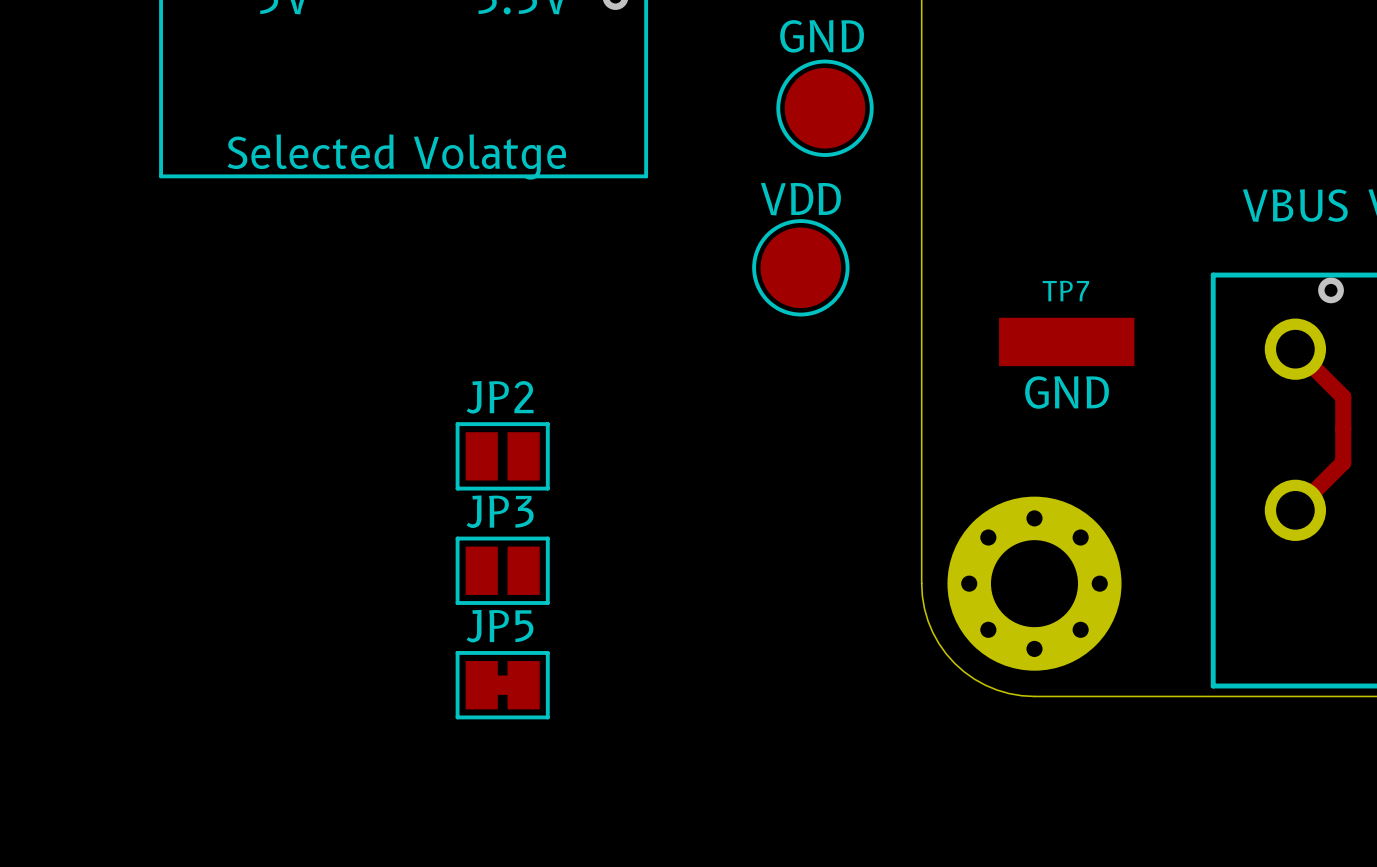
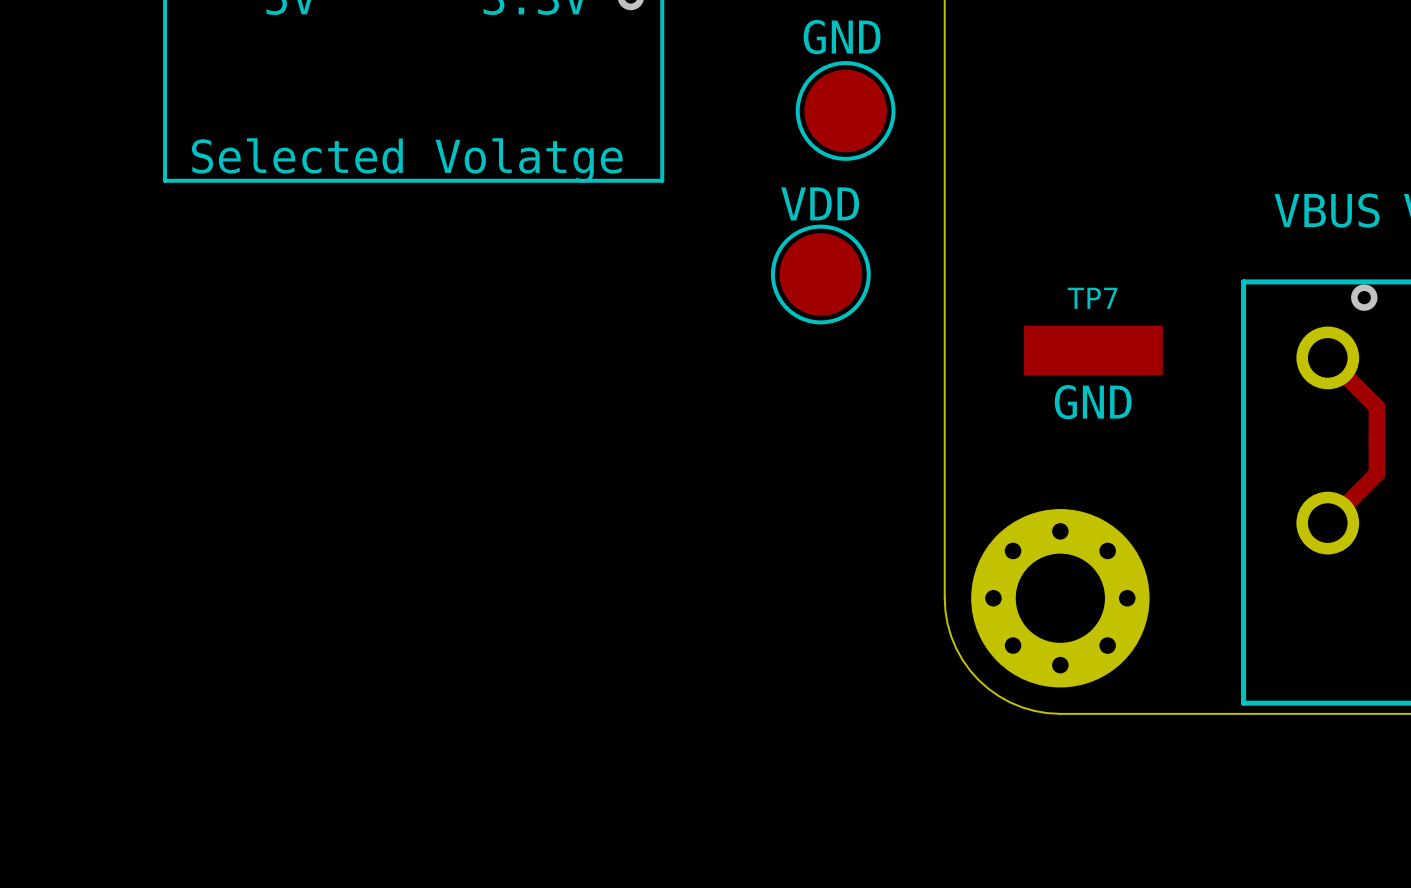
JP2: (502, 456) -> none
JP3: (502, 570) -> none
JP5: (502, 685) -> none

